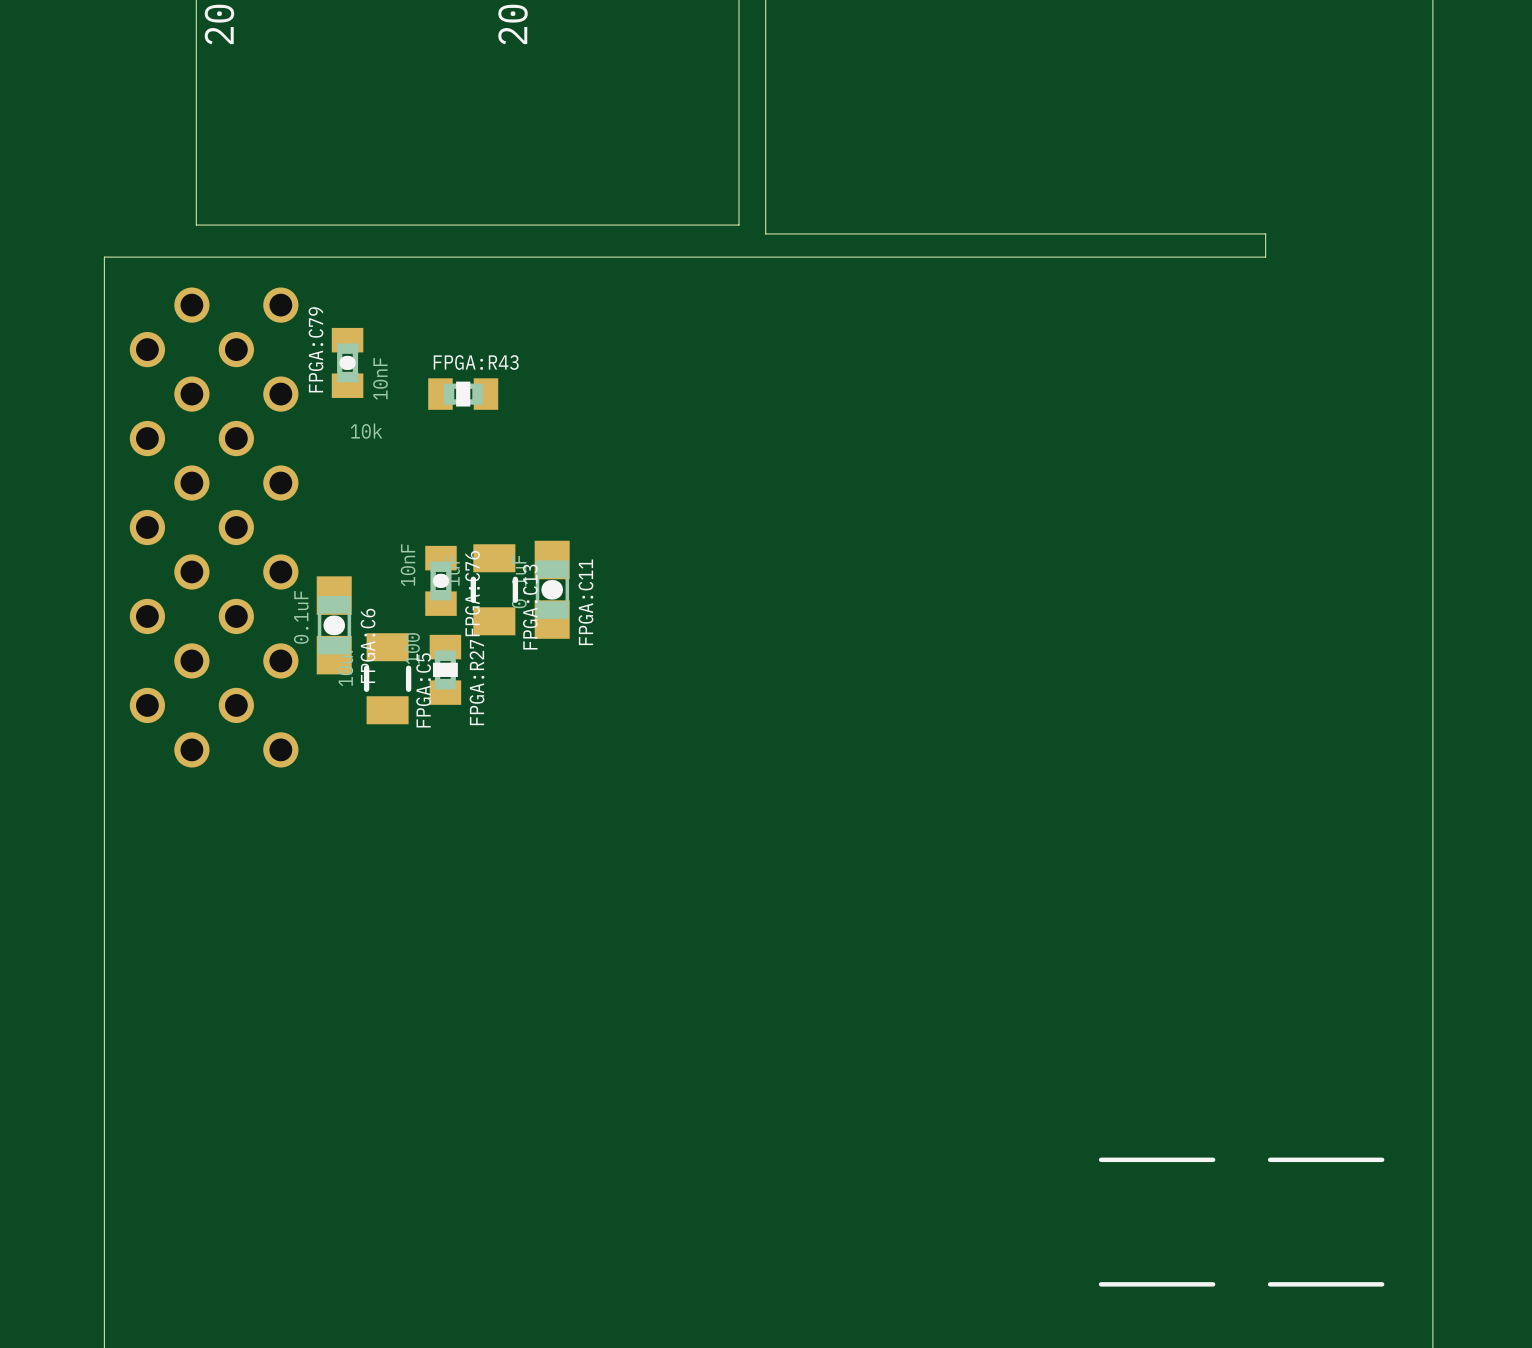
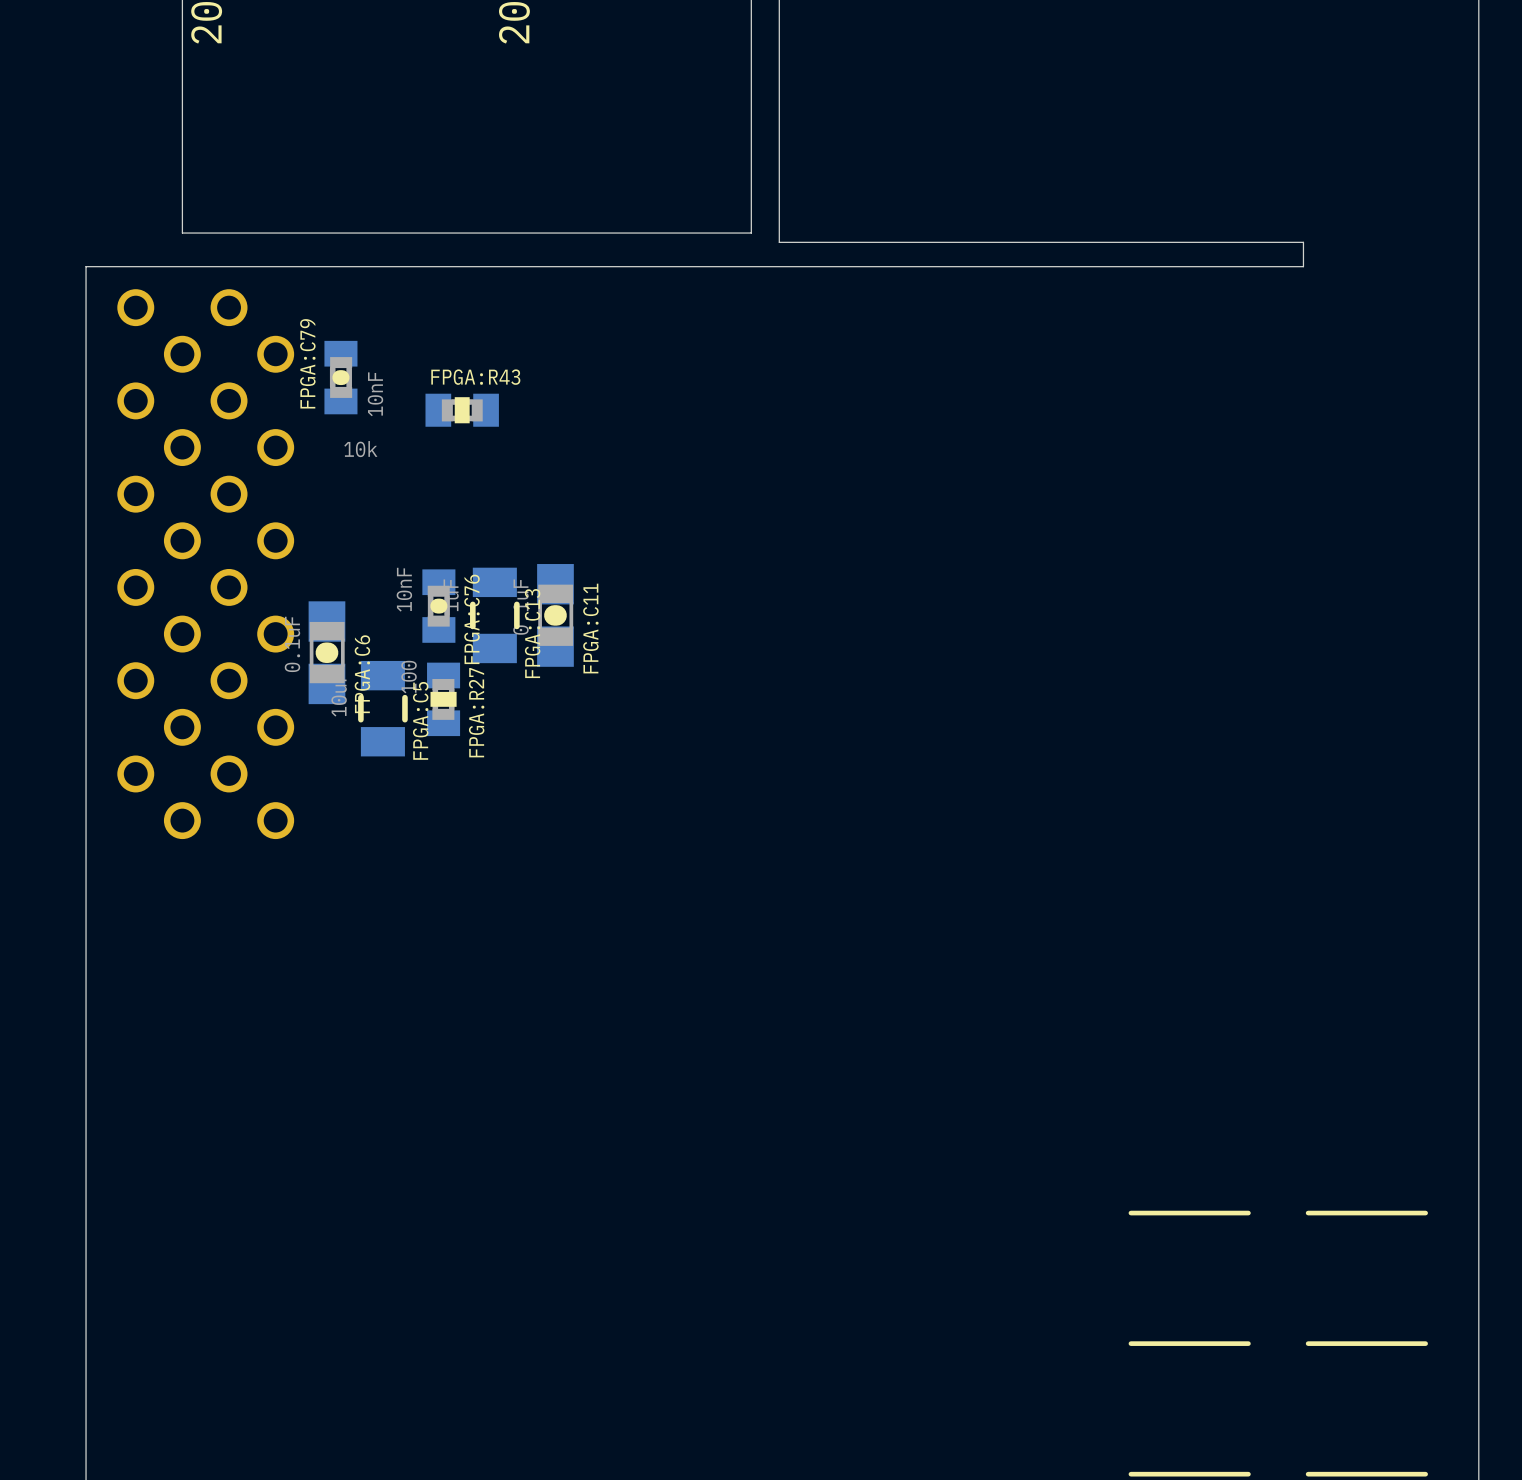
part footprint: [129, 287, 299, 768] -> [117, 289, 295, 840]

